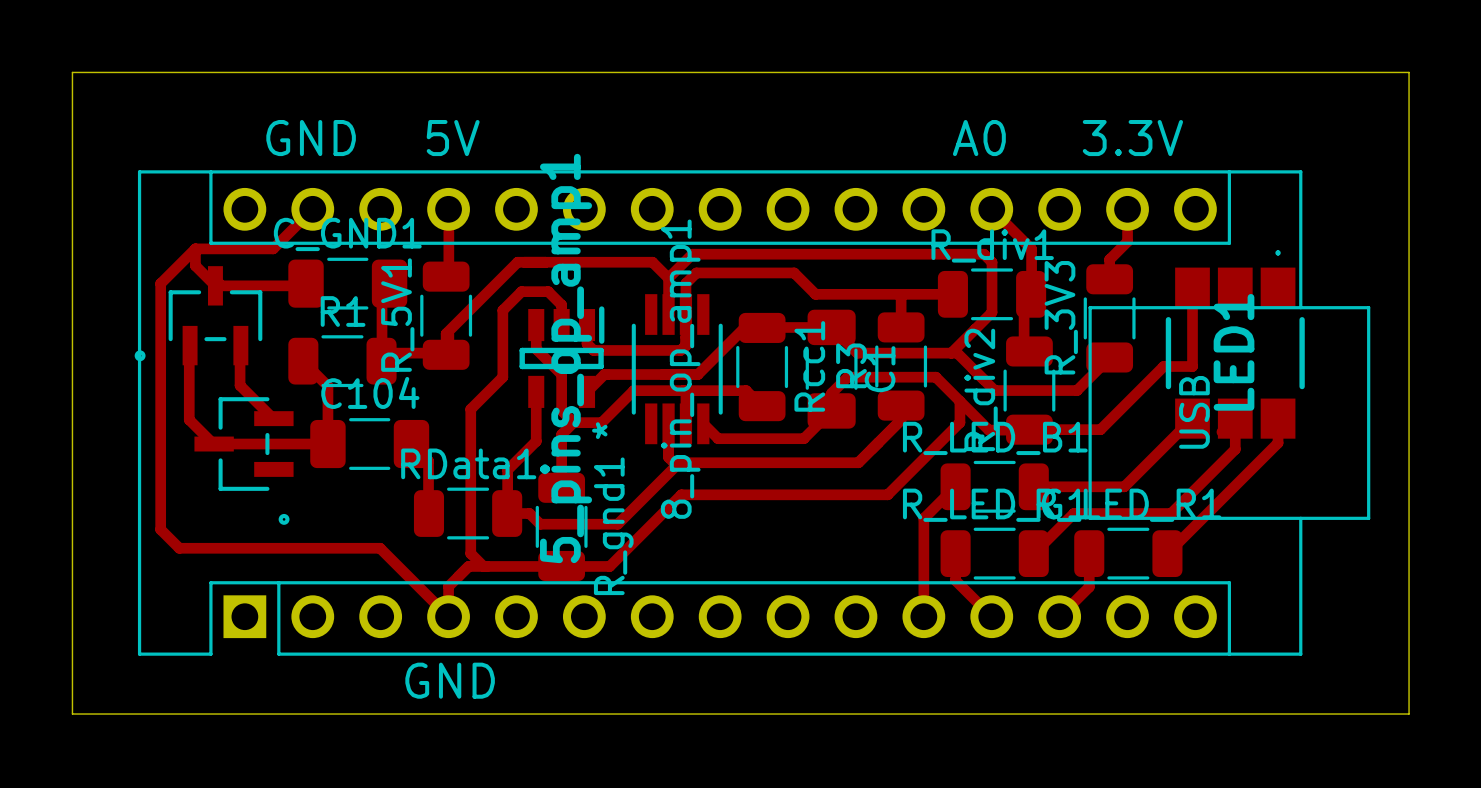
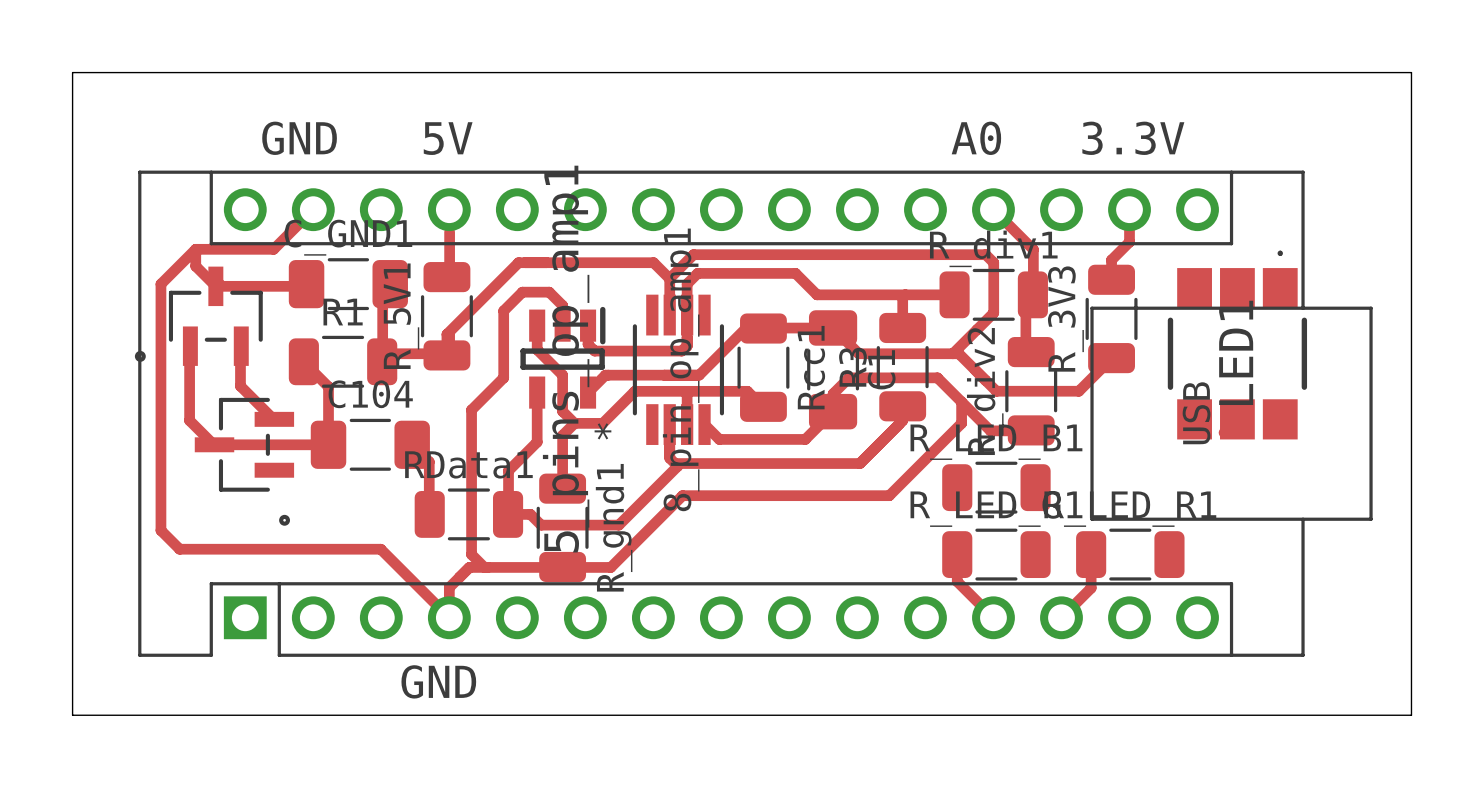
top track: (1192, 287) (1192, 366) (1163, 366) (1100, 429) (1029, 429) -> none
top track: (1192, 418) (1124, 486) (1033, 486) -> none
top track: (1235, 418) (1235, 449) (1171, 513) (1073, 513) (1033, 553) -> none
top track: (1278, 418) (1278, 443) (1167, 553) -> none
top track: (955, 486) (923, 518) (923, 616) -> none

